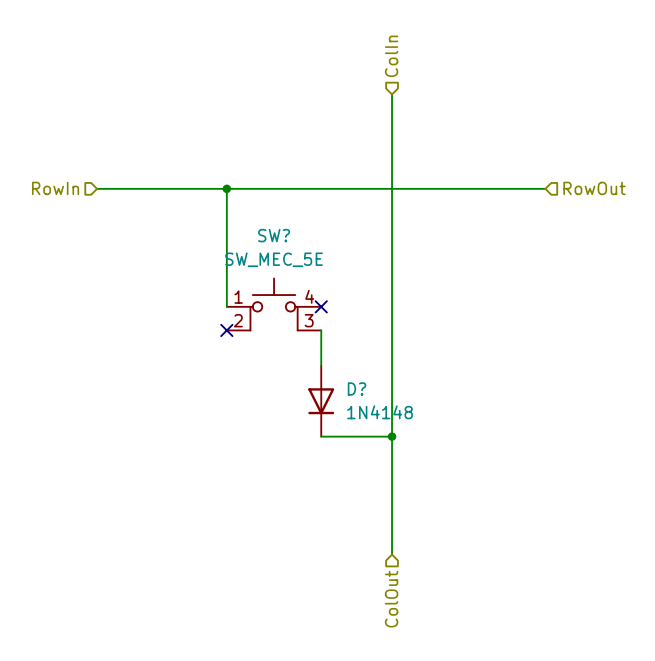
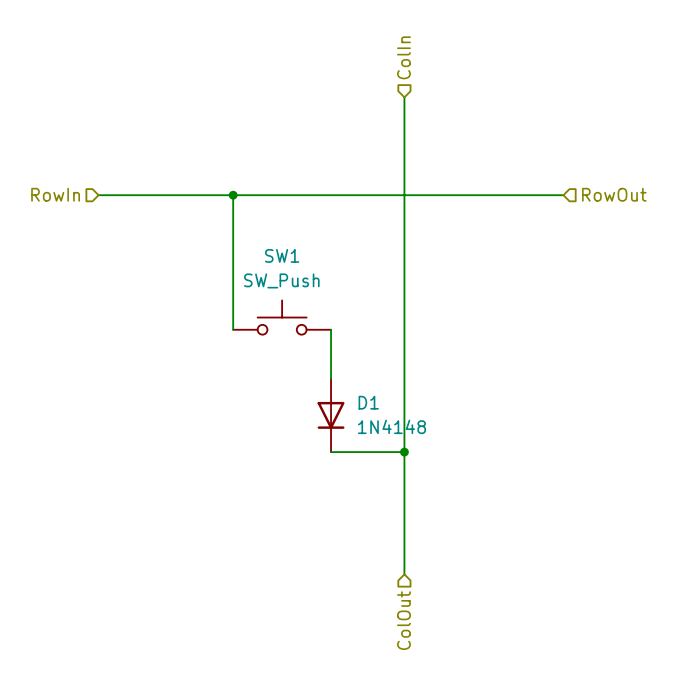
SW?: SW_MEC_5E (274, 304) -> none
wire: none -> (233, 317) (233, 329)
SW1: none -> SW_Push (282, 317)
no-connect mark: (321, 306) -> none
wire: none -> (331, 329) (331, 341)
no-connect mark: (226, 330) -> none
D? name: D? (357, 388) -> D1 (368, 402)

